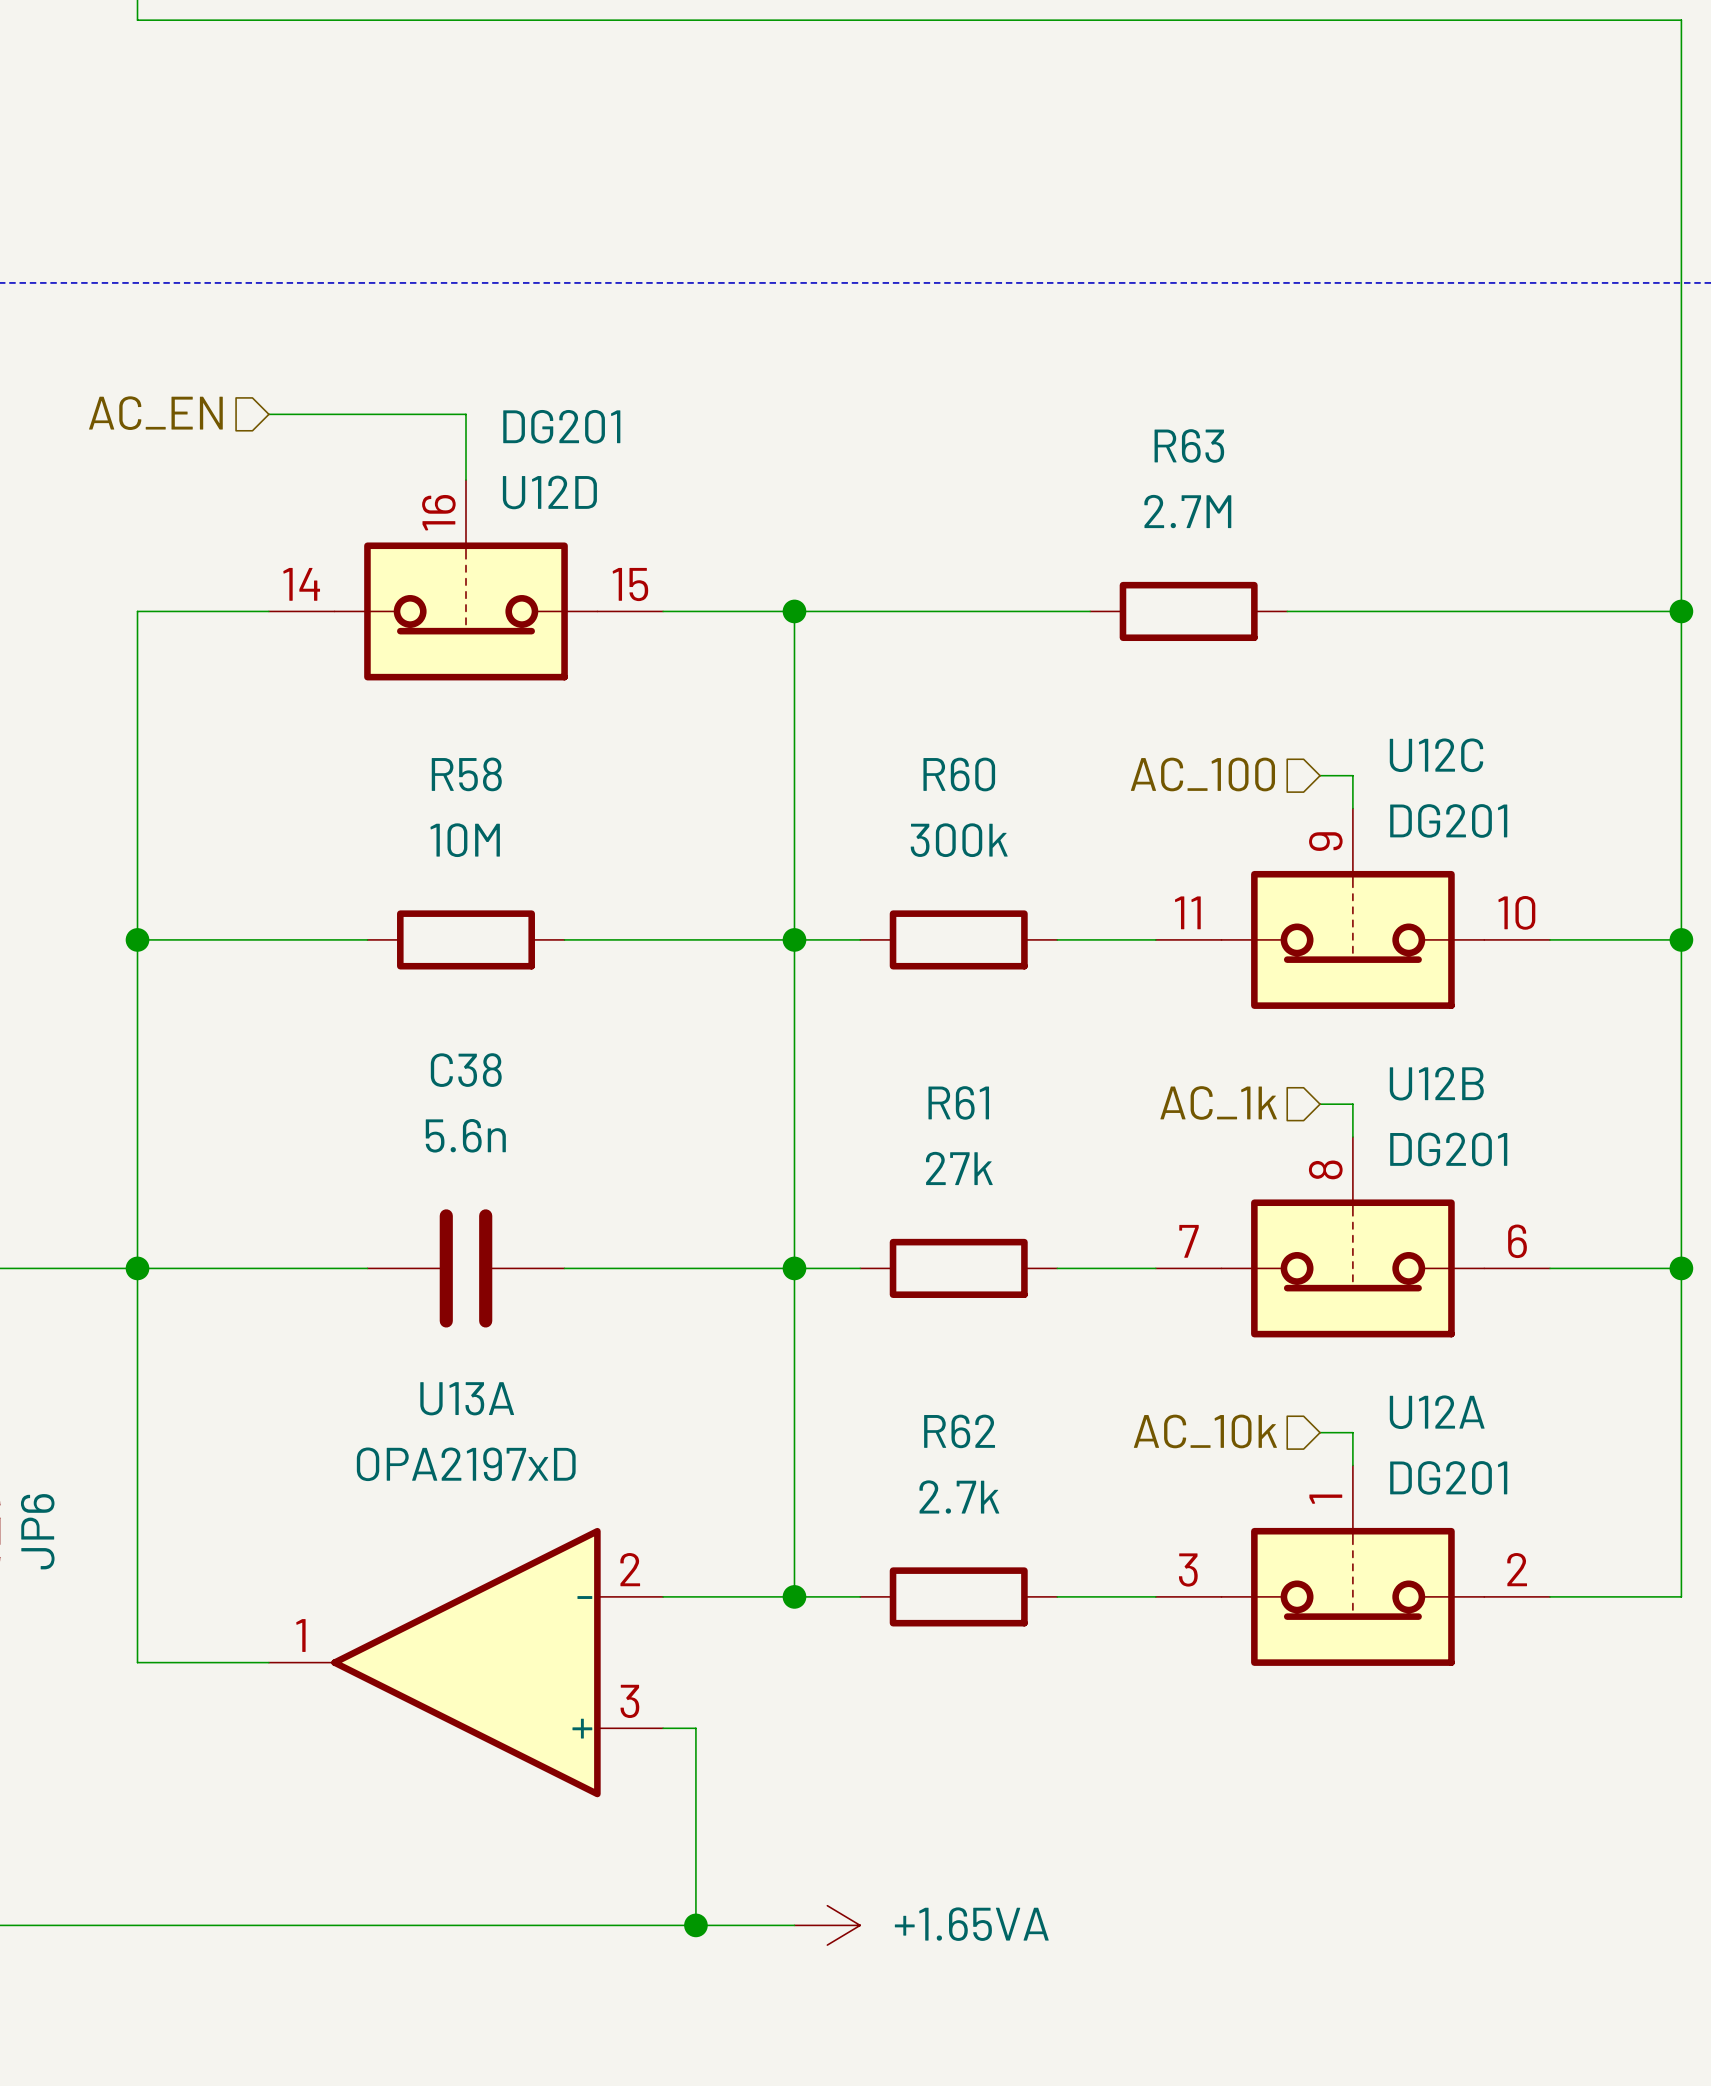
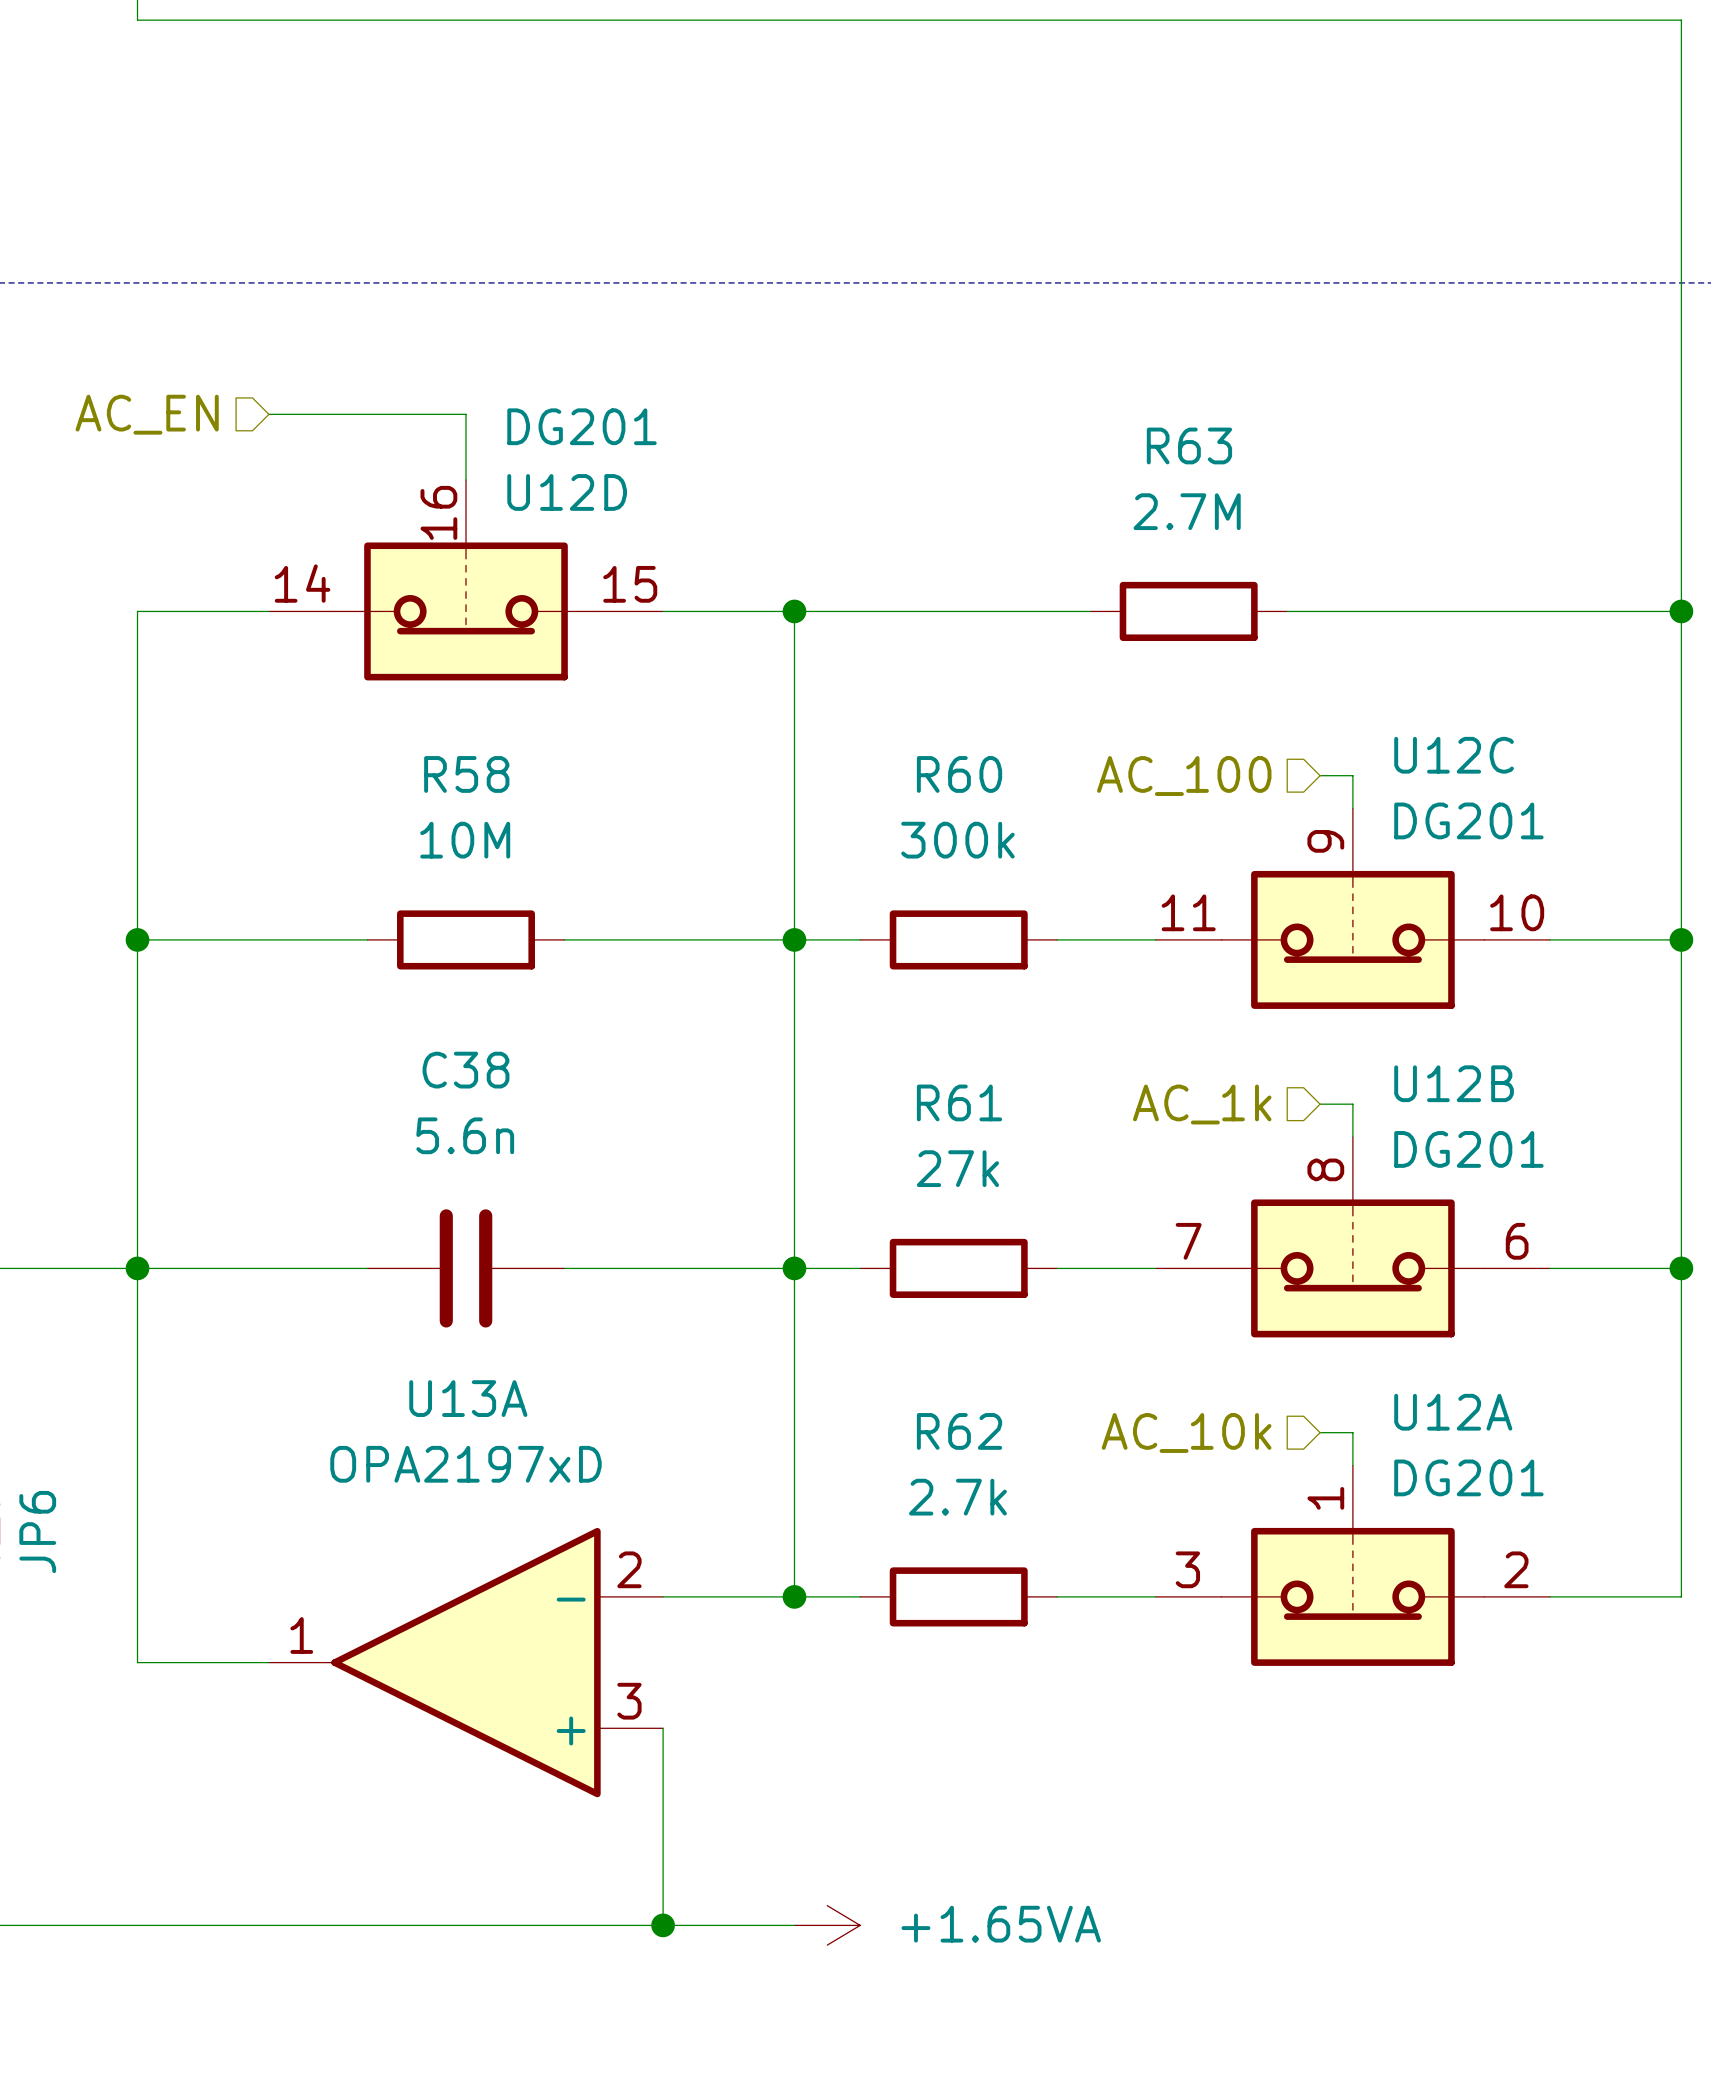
wire: (663, 1728) (695, 1728) (695, 1925) -> (663, 1728) (663, 1925)
junction position: (695, 1925) -> (663, 1925)

